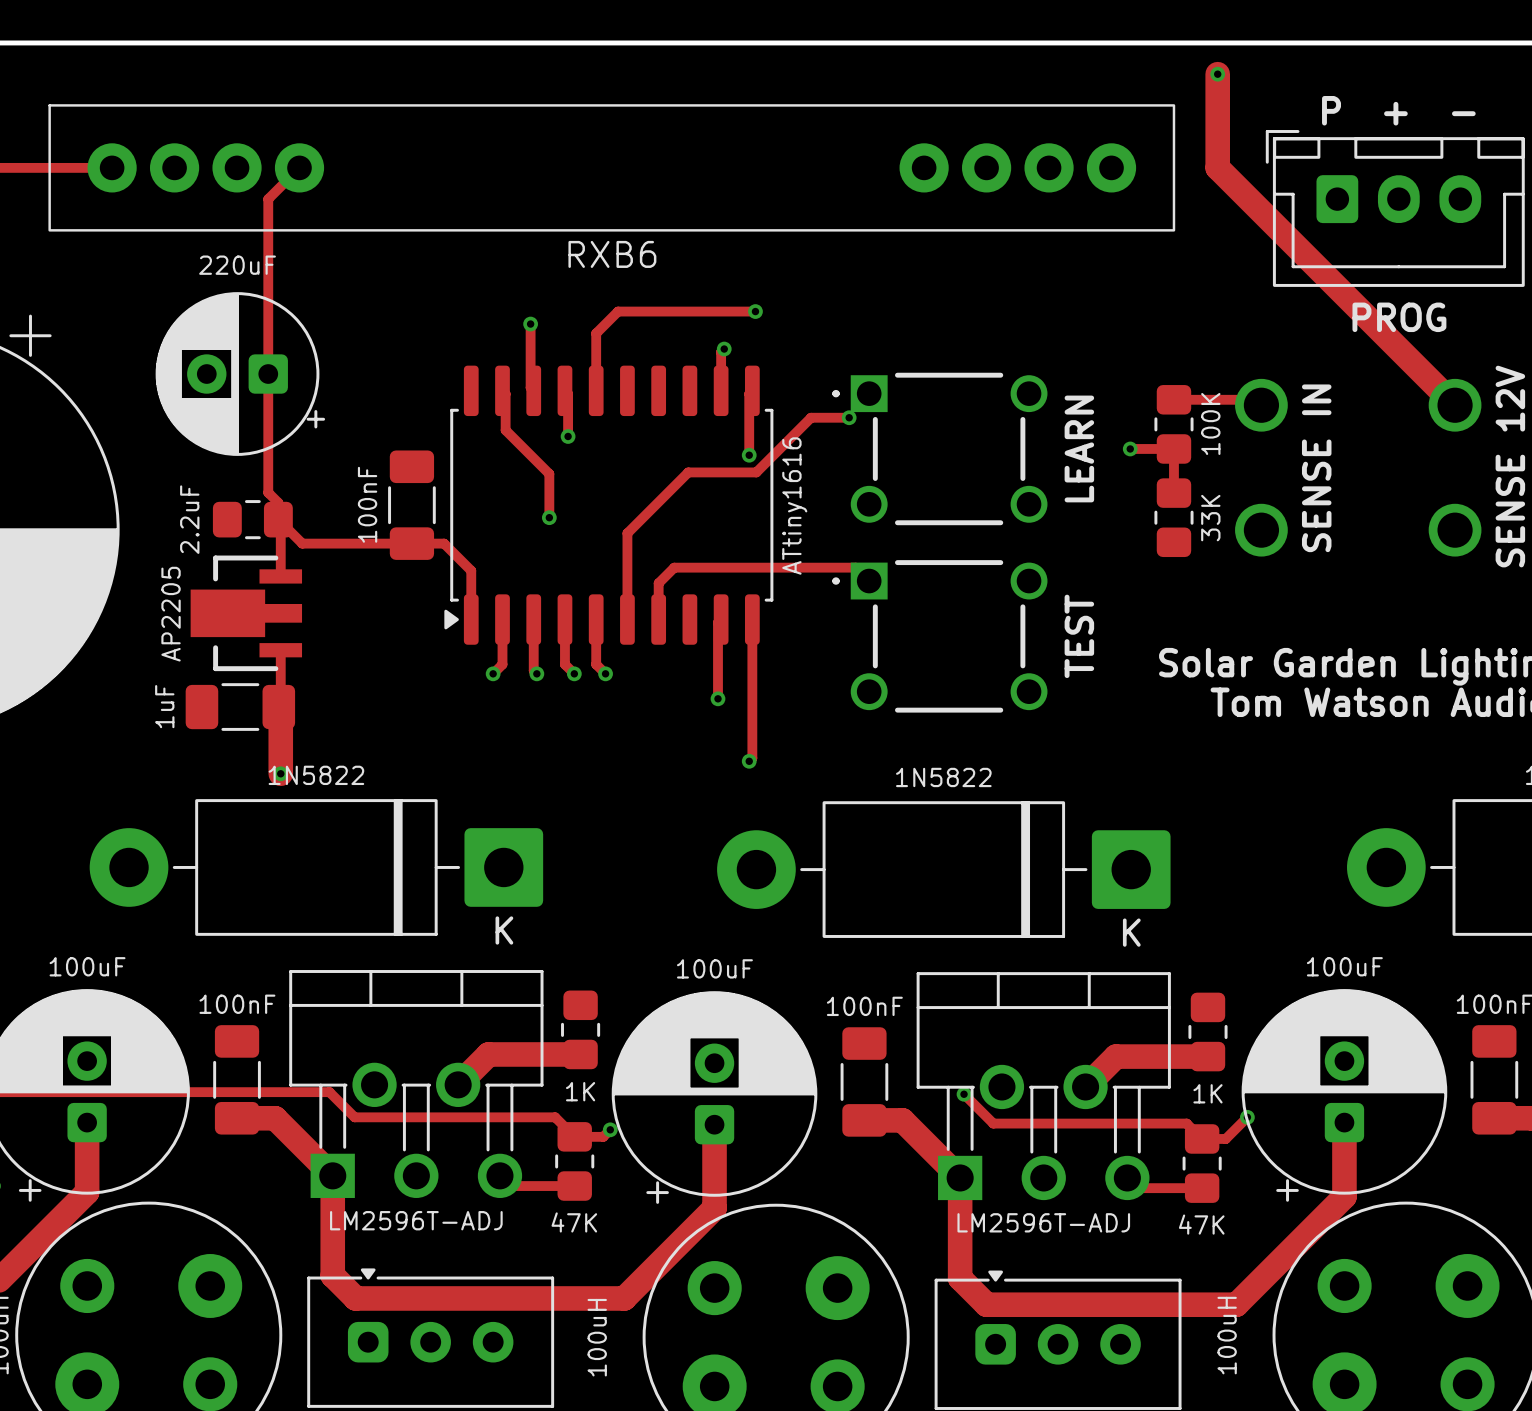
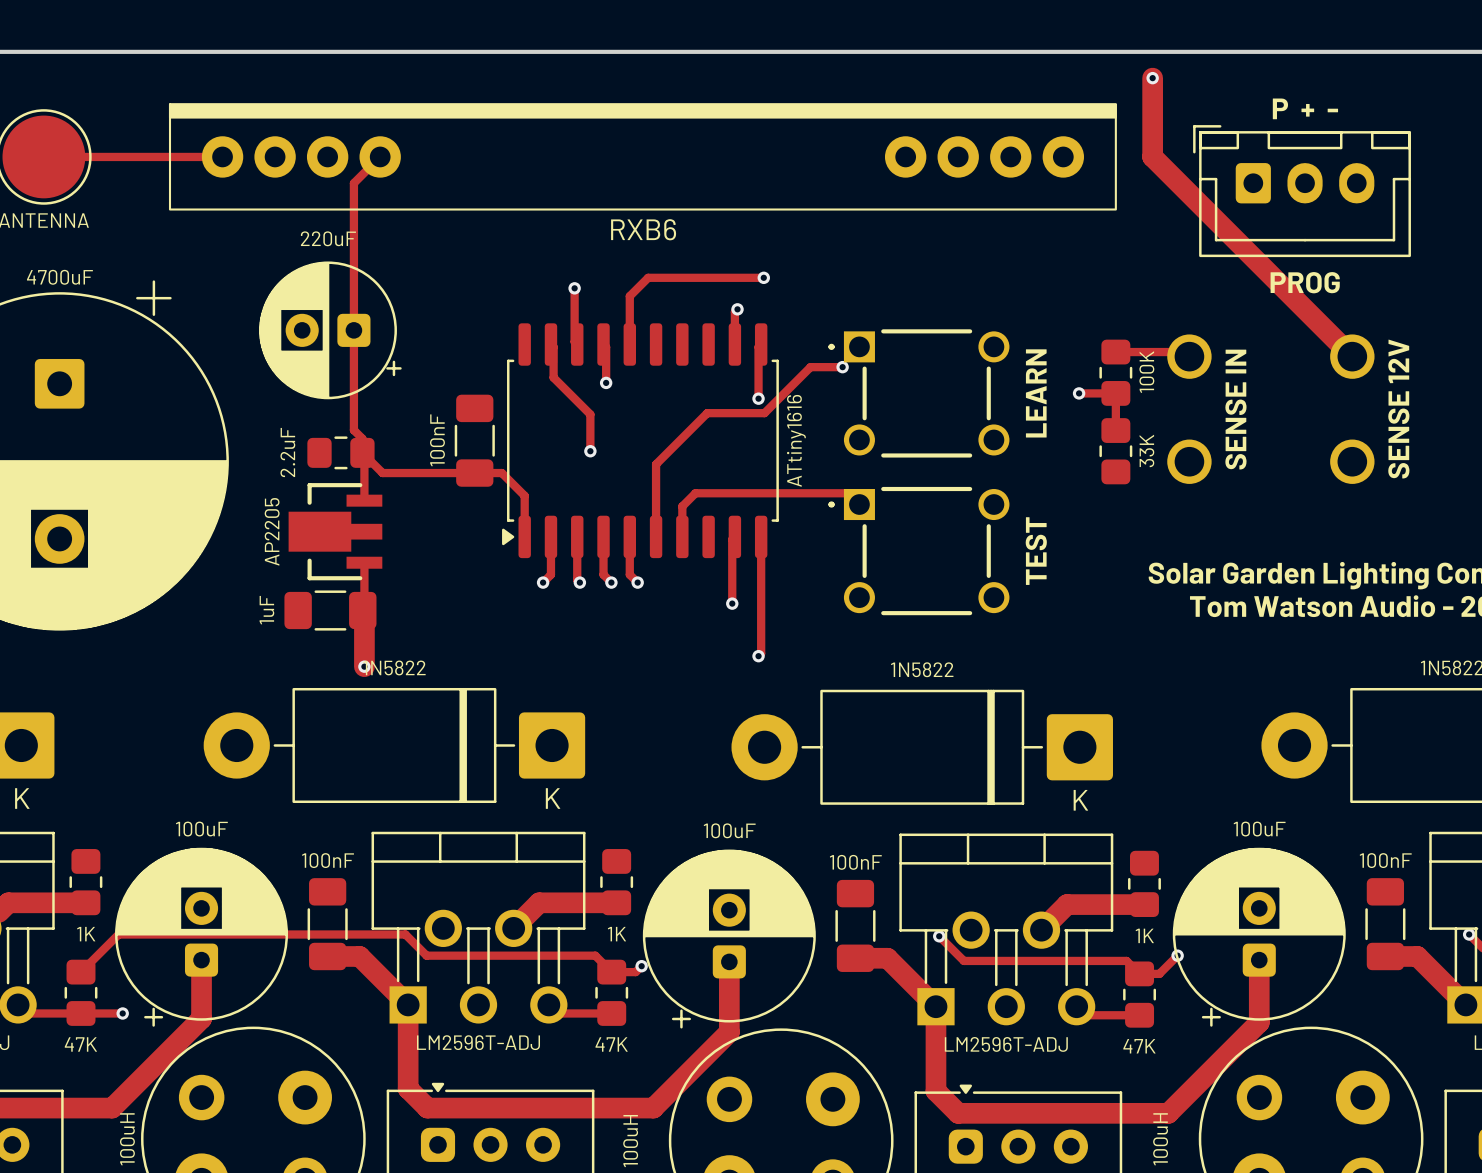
RXB6 footprint: [48, 104, 1176, 232] -> [168, 103, 1117, 211]

